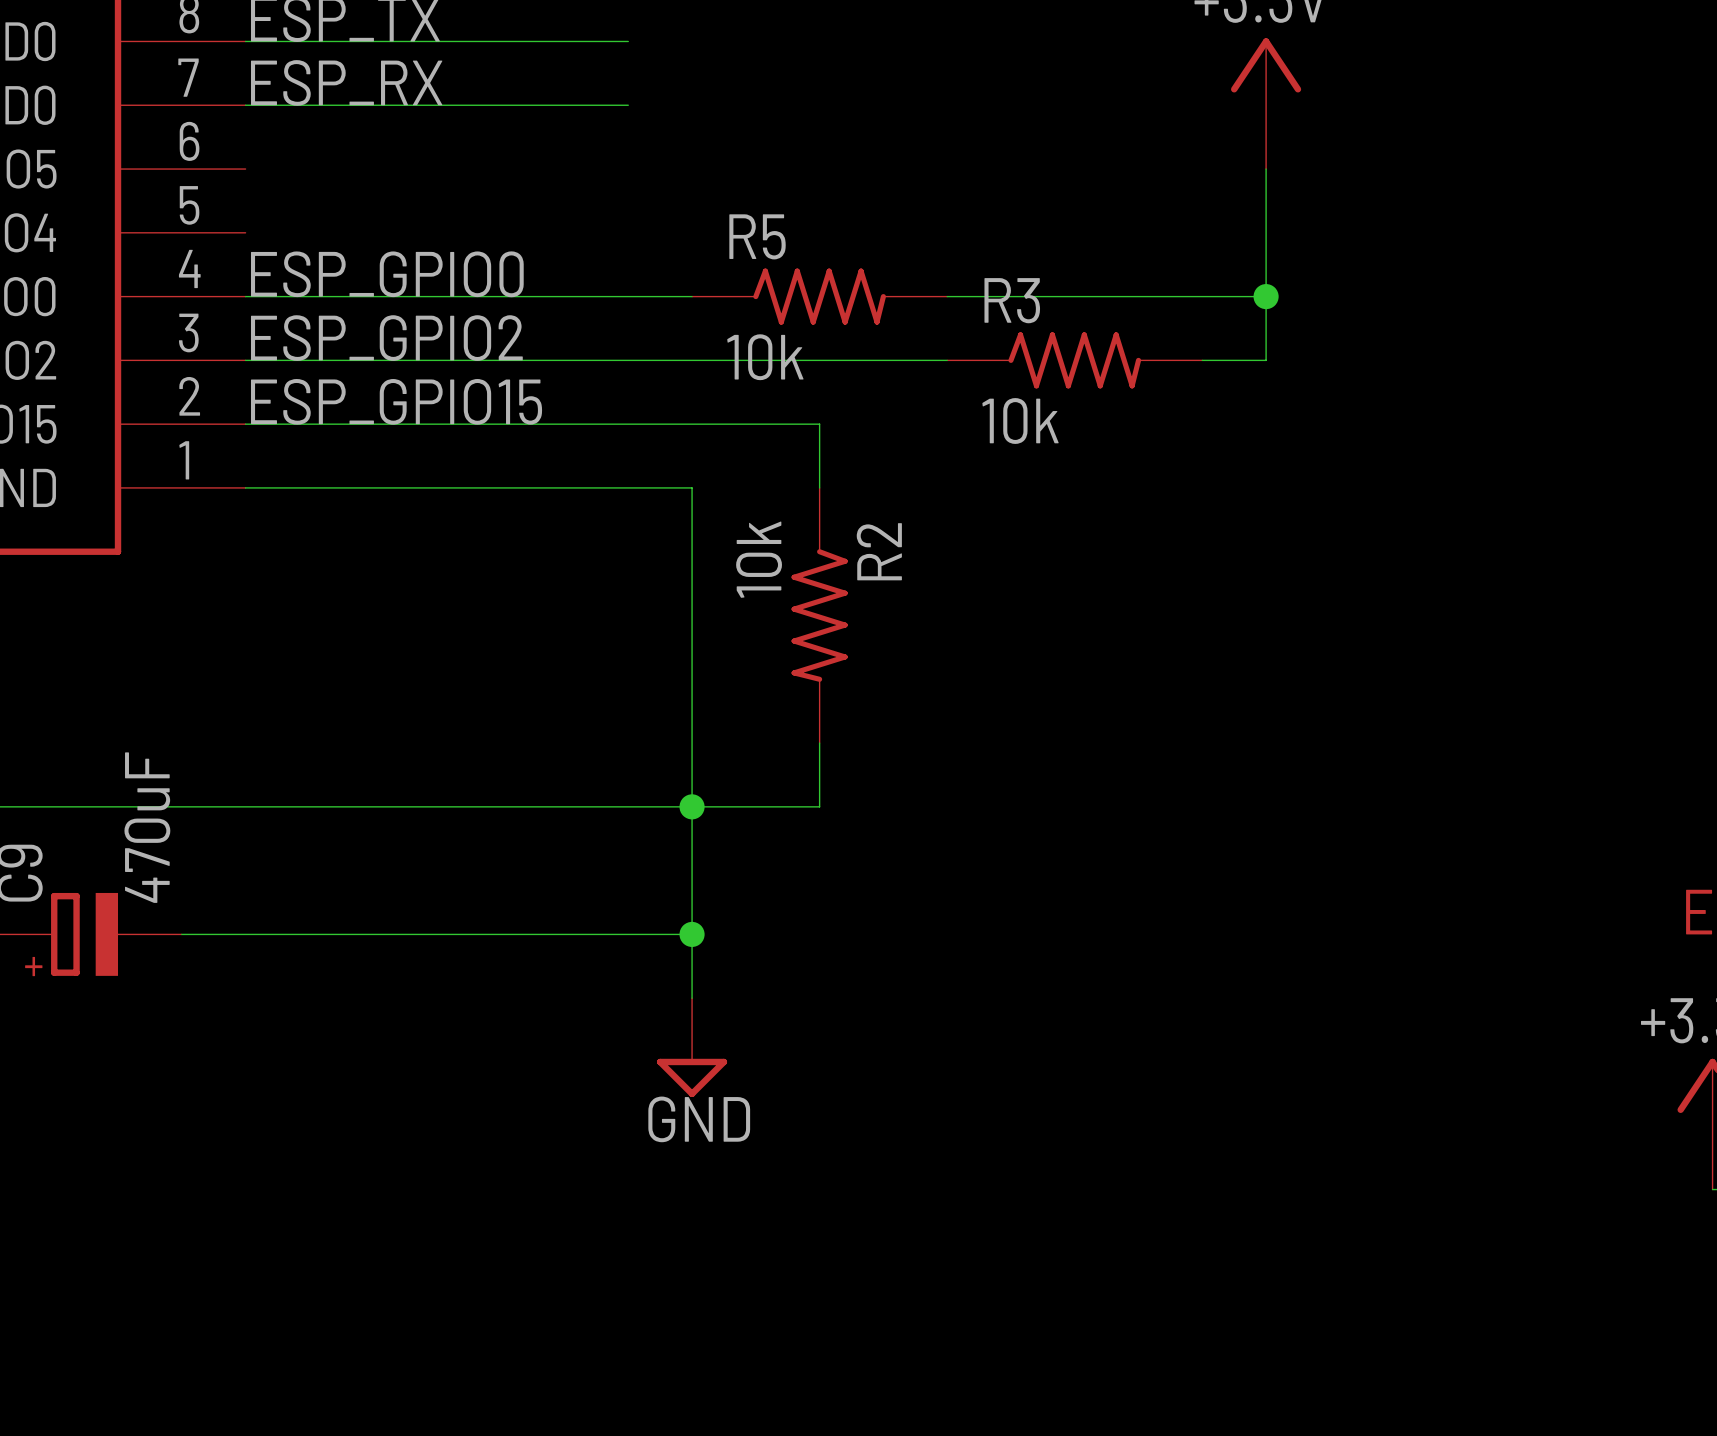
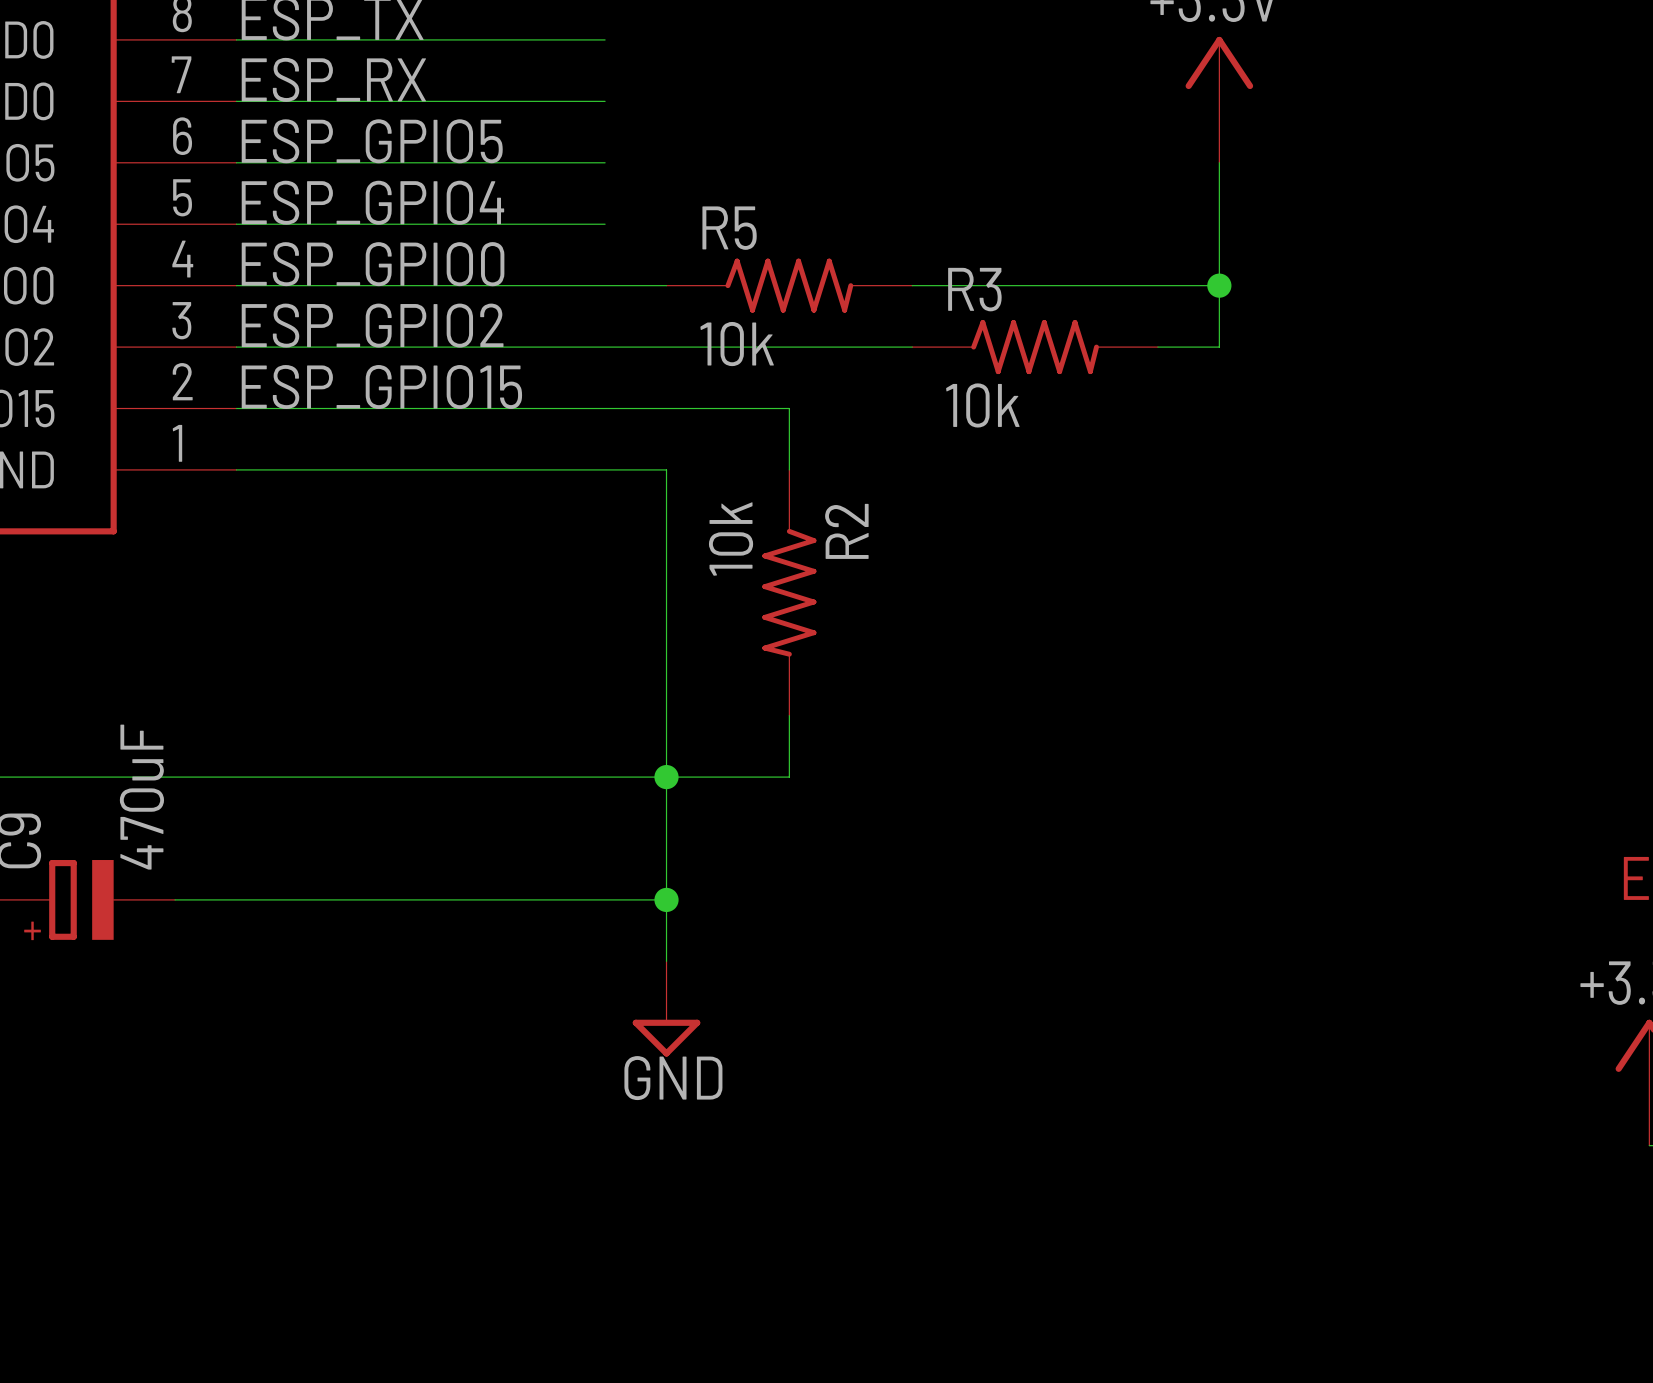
label: none -> ESP_GPIO5 (372, 141)
wire: none -> (236, 162) (605, 162)
label: none -> ESP_GPIO4 (372, 202)
wire: none -> (236, 224) (605, 224)

